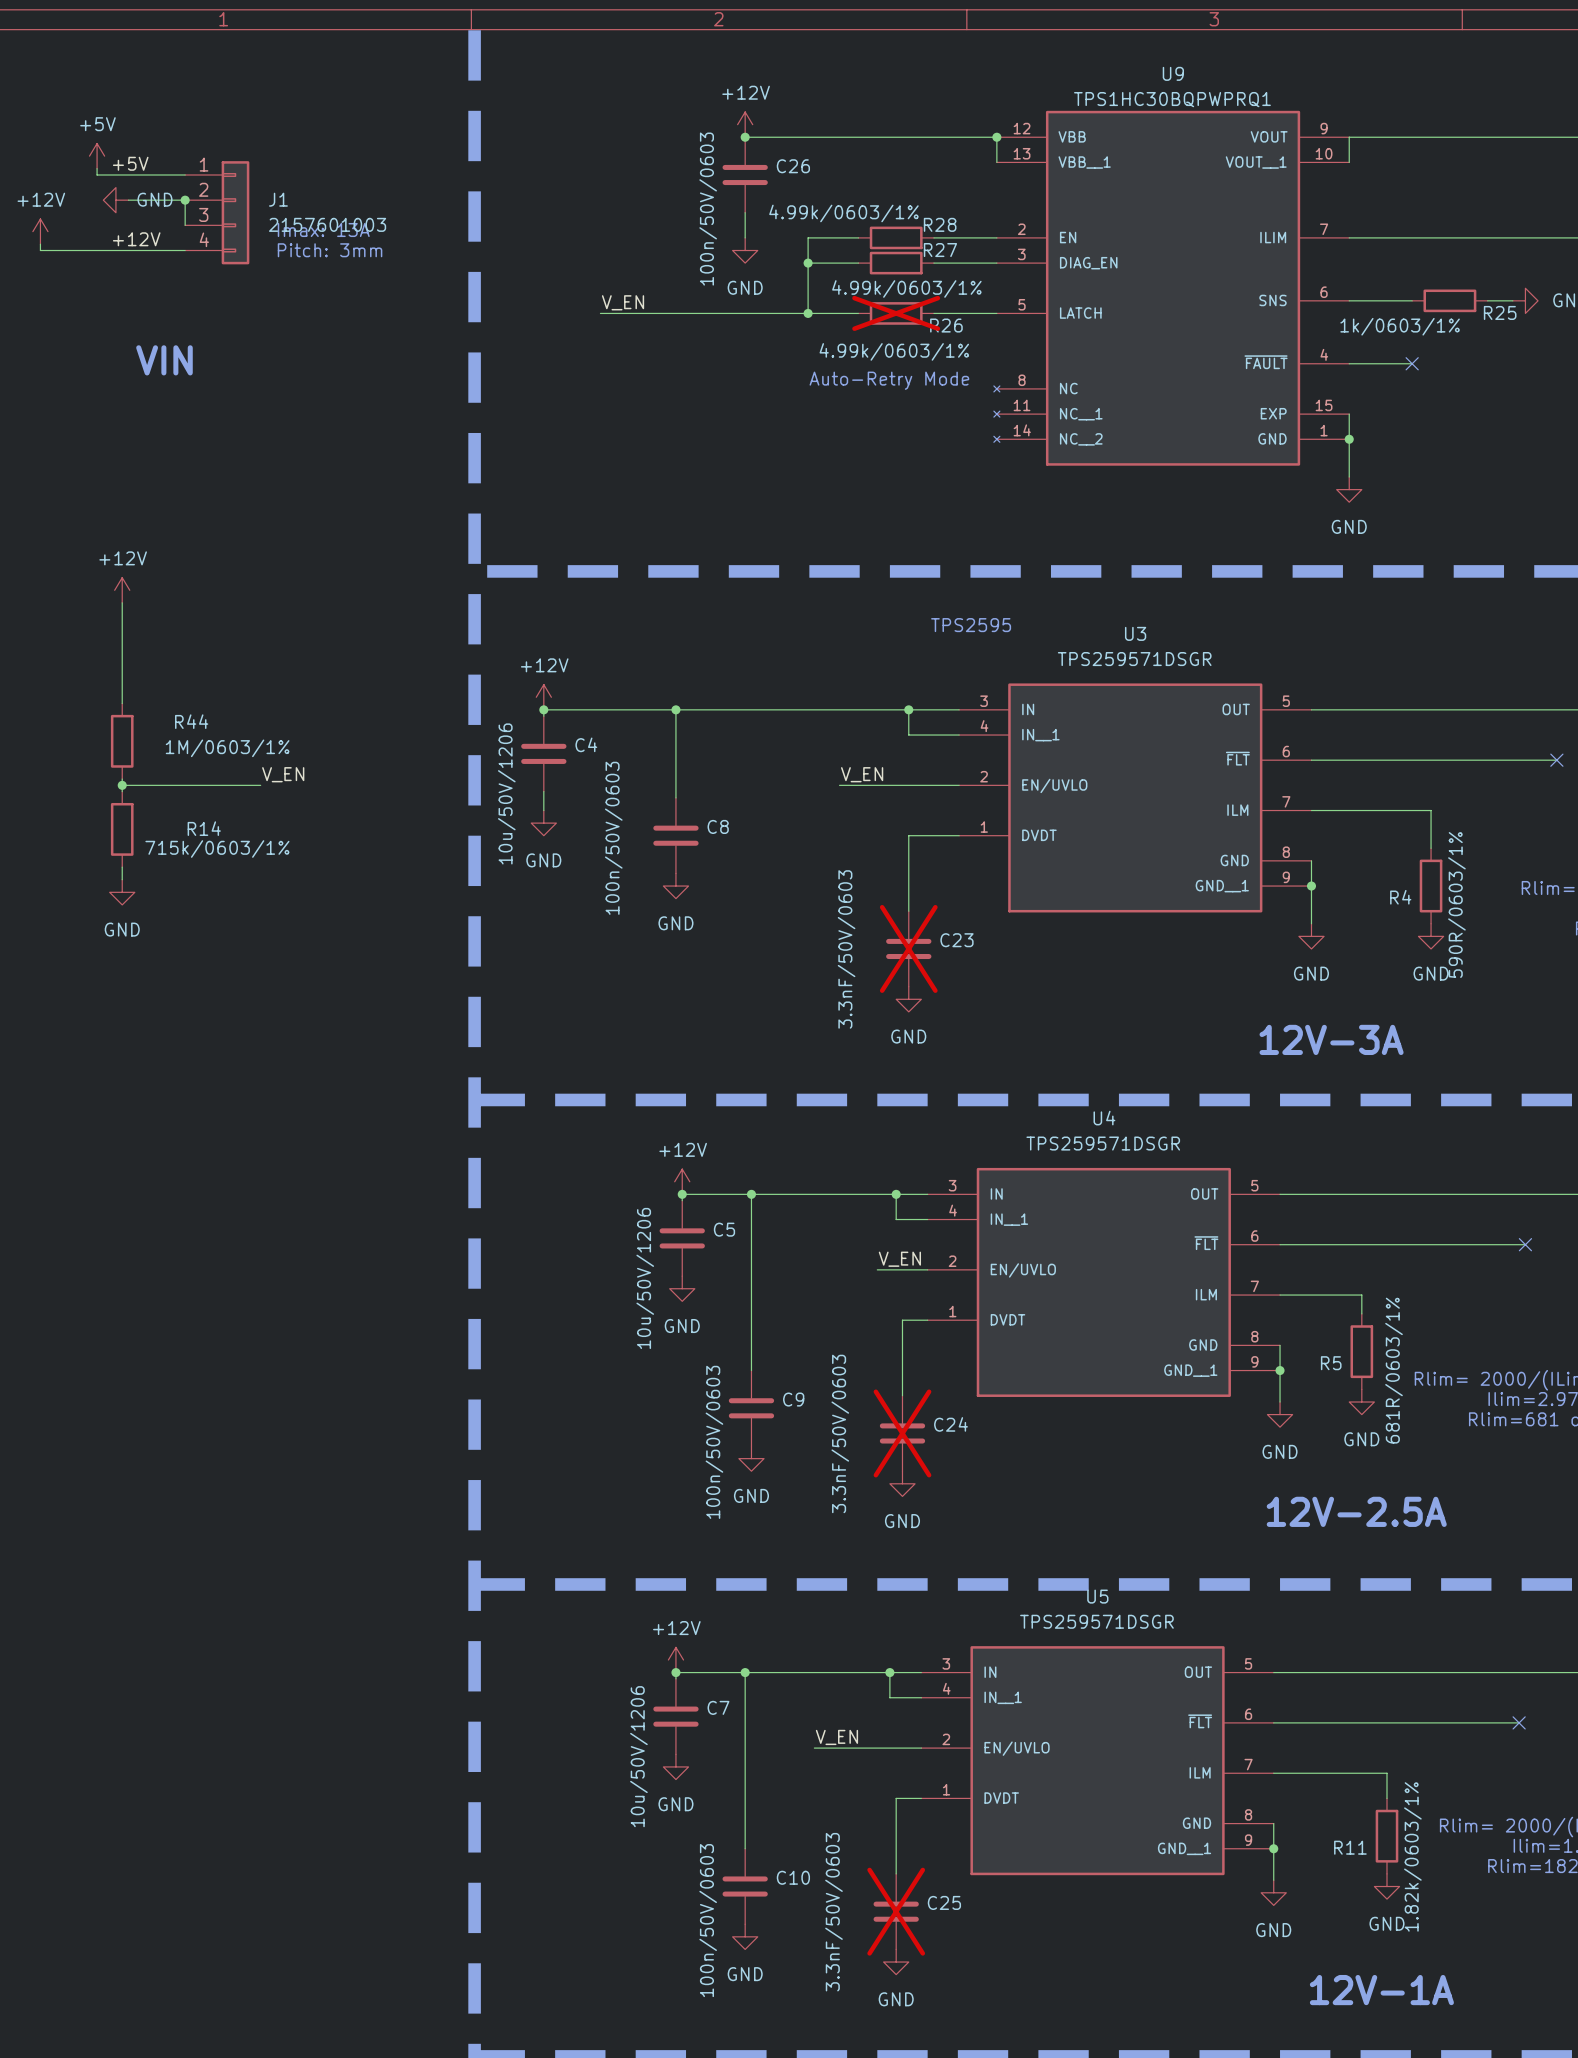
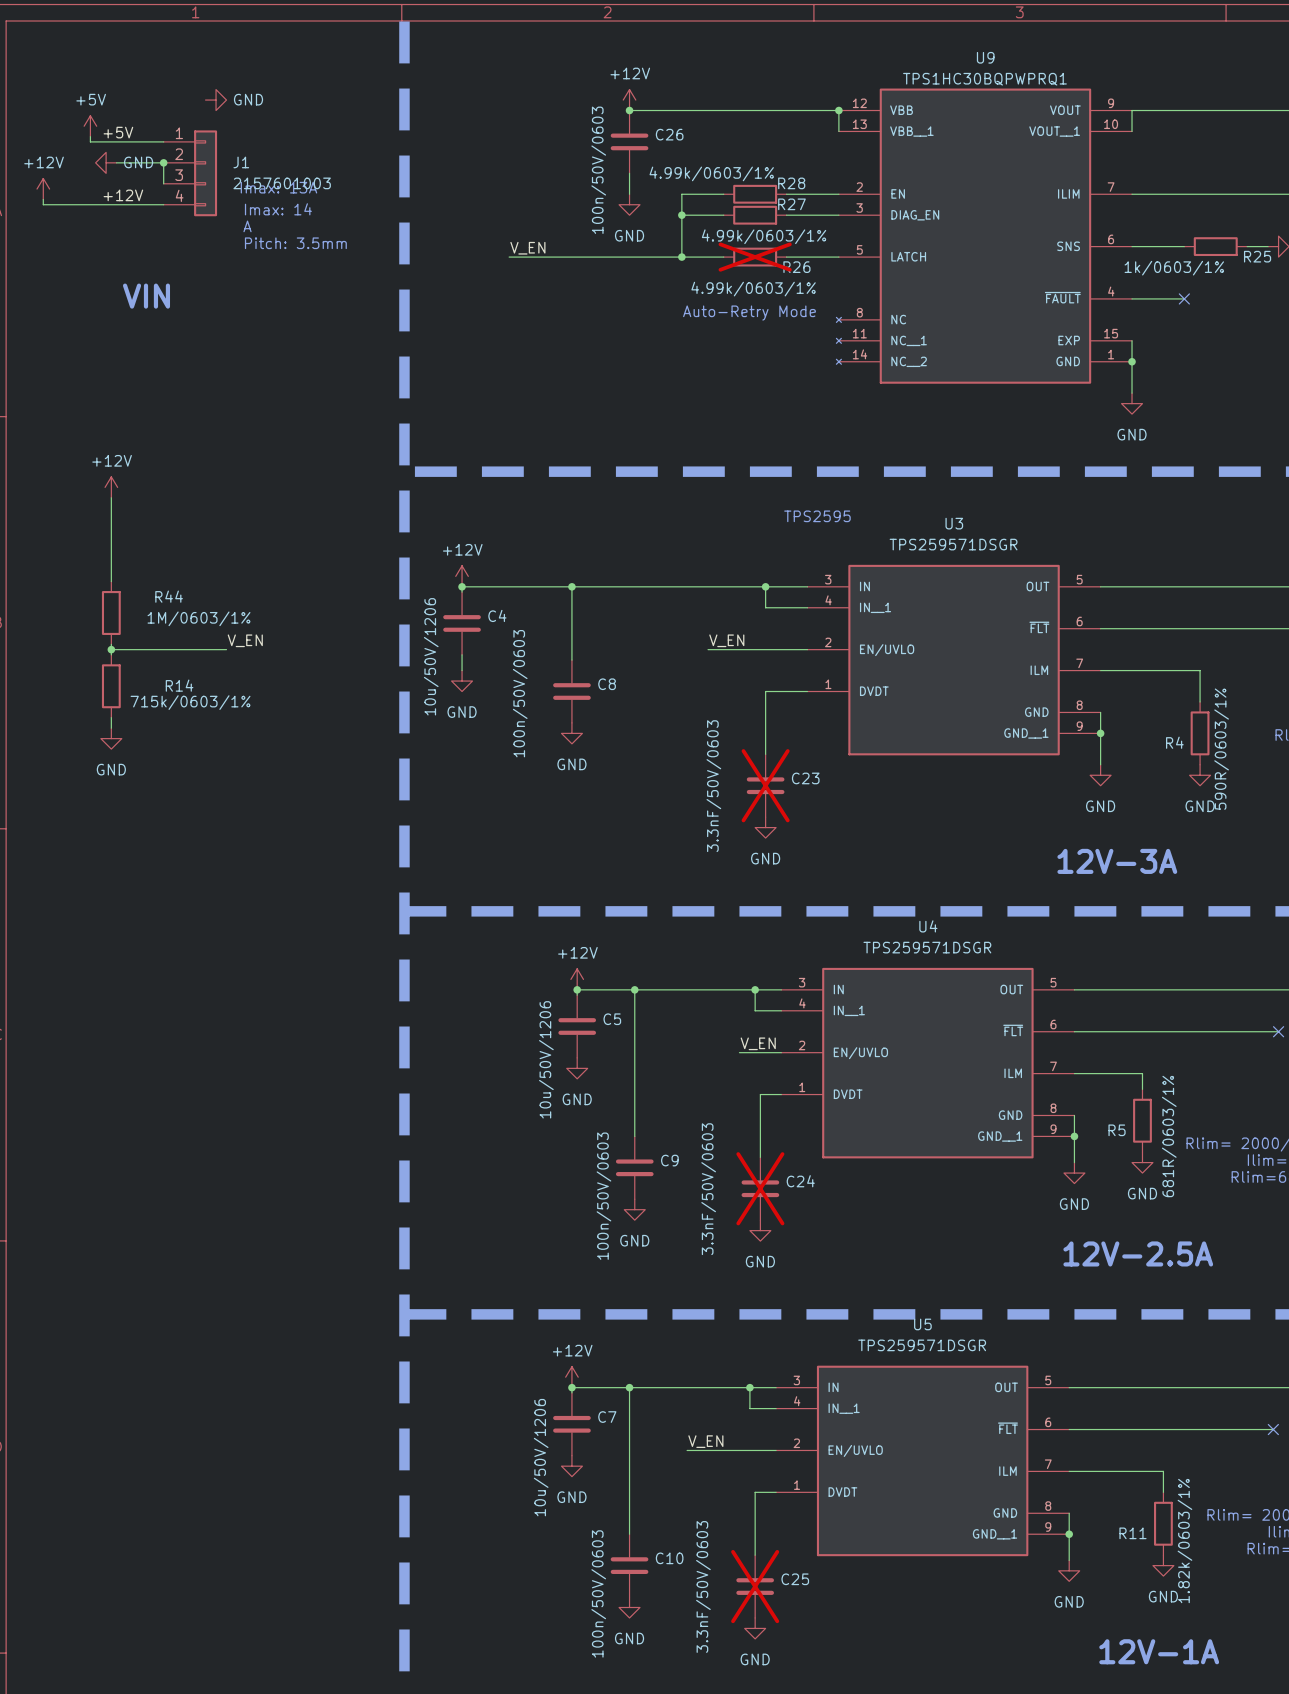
power symbol: none -> GND (216, 100)
text: Pitch: 3mm (330, 250) -> Imax: 14 (278, 209)
text: none -> A (247, 226)
text: none -> Pitch: 3.5mm (295, 243)

